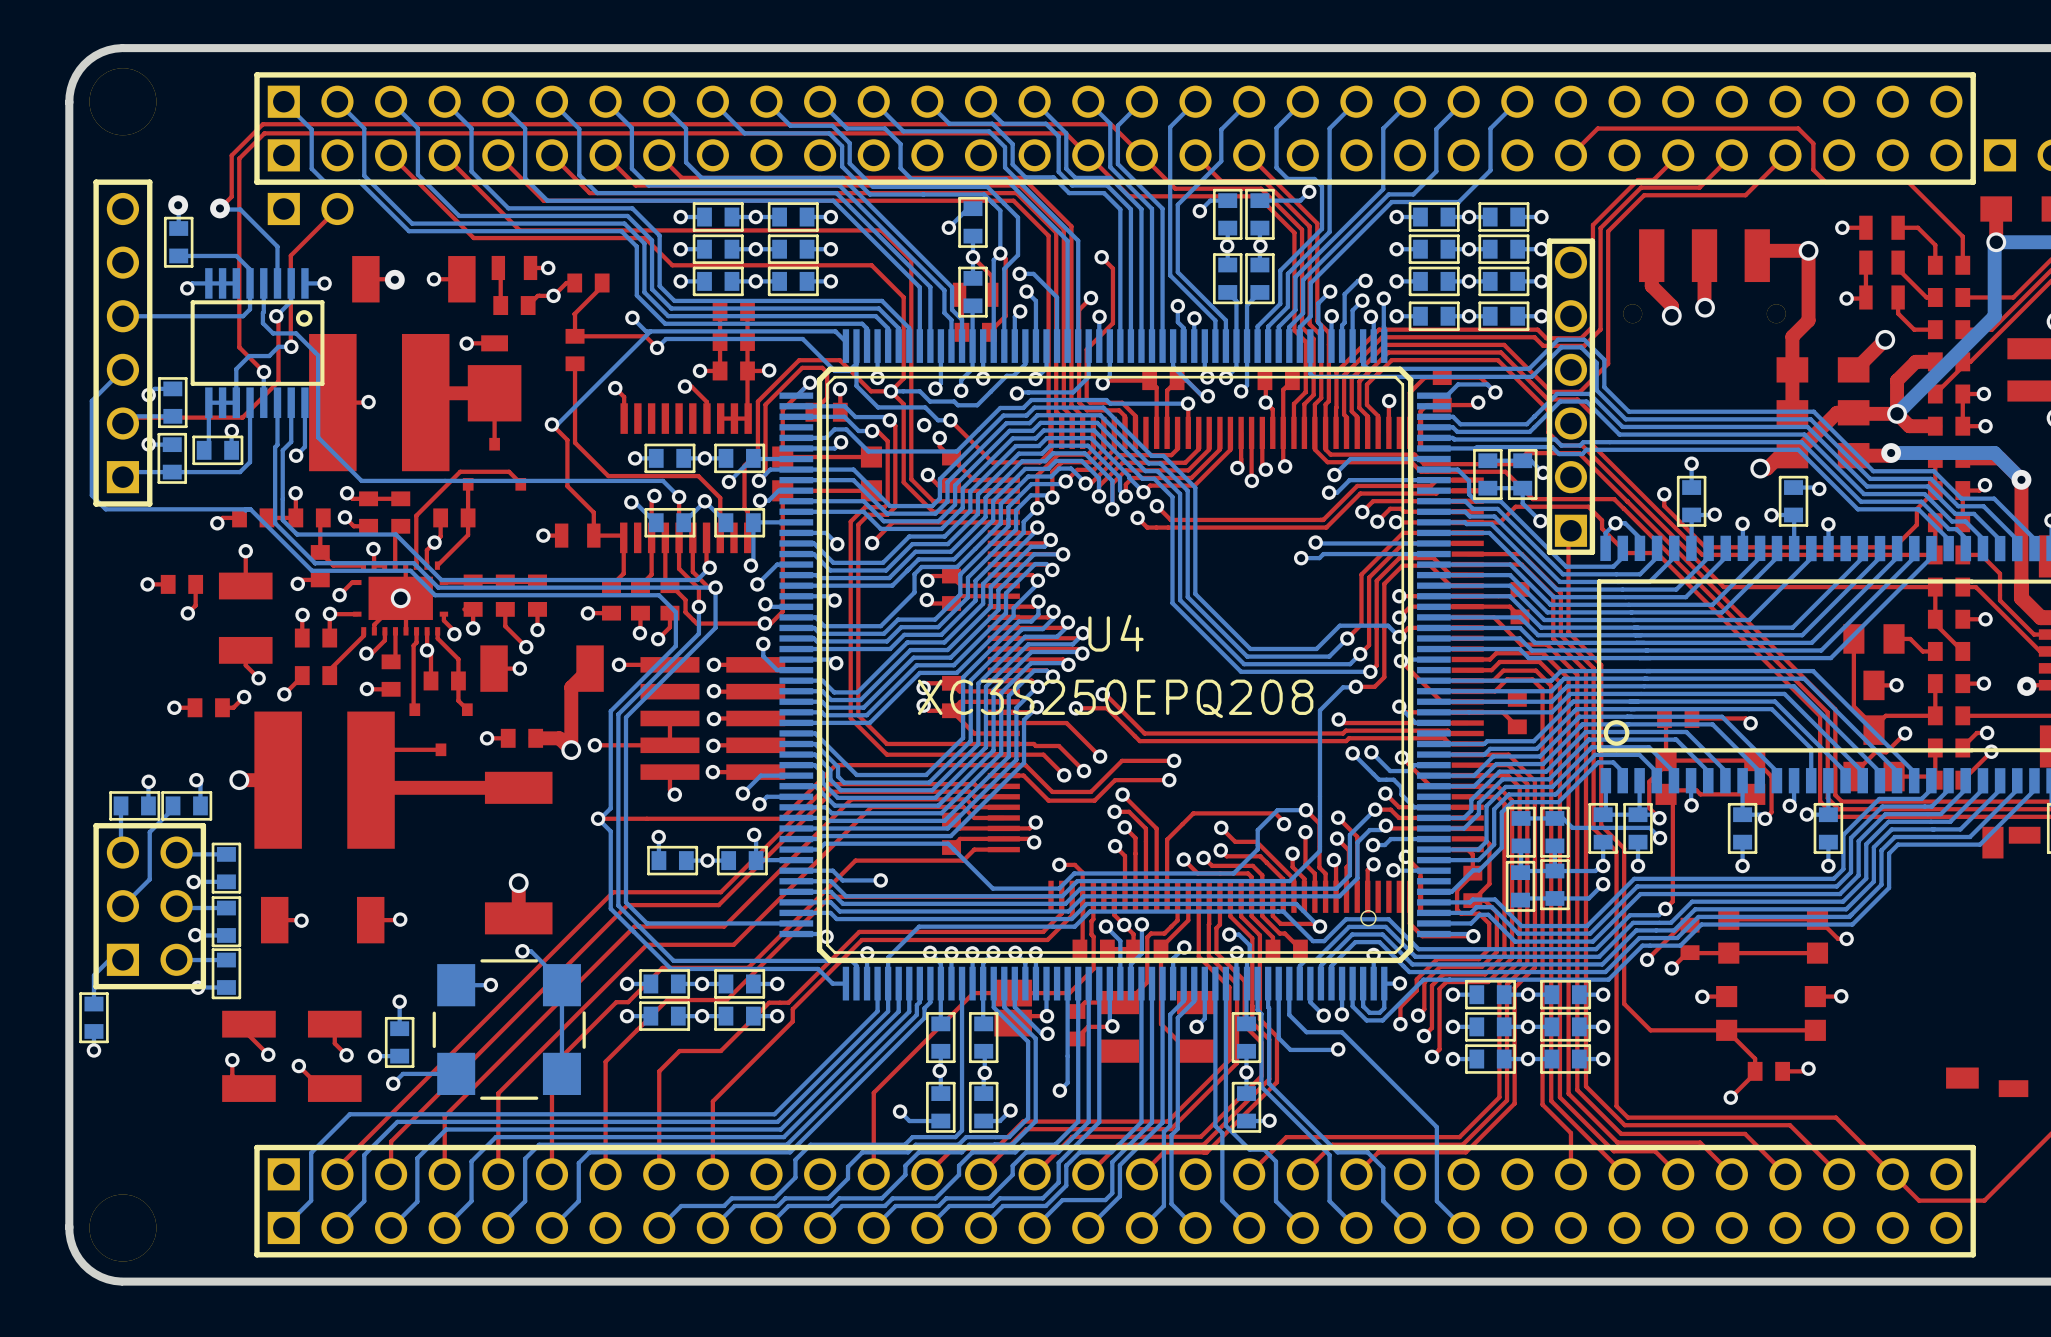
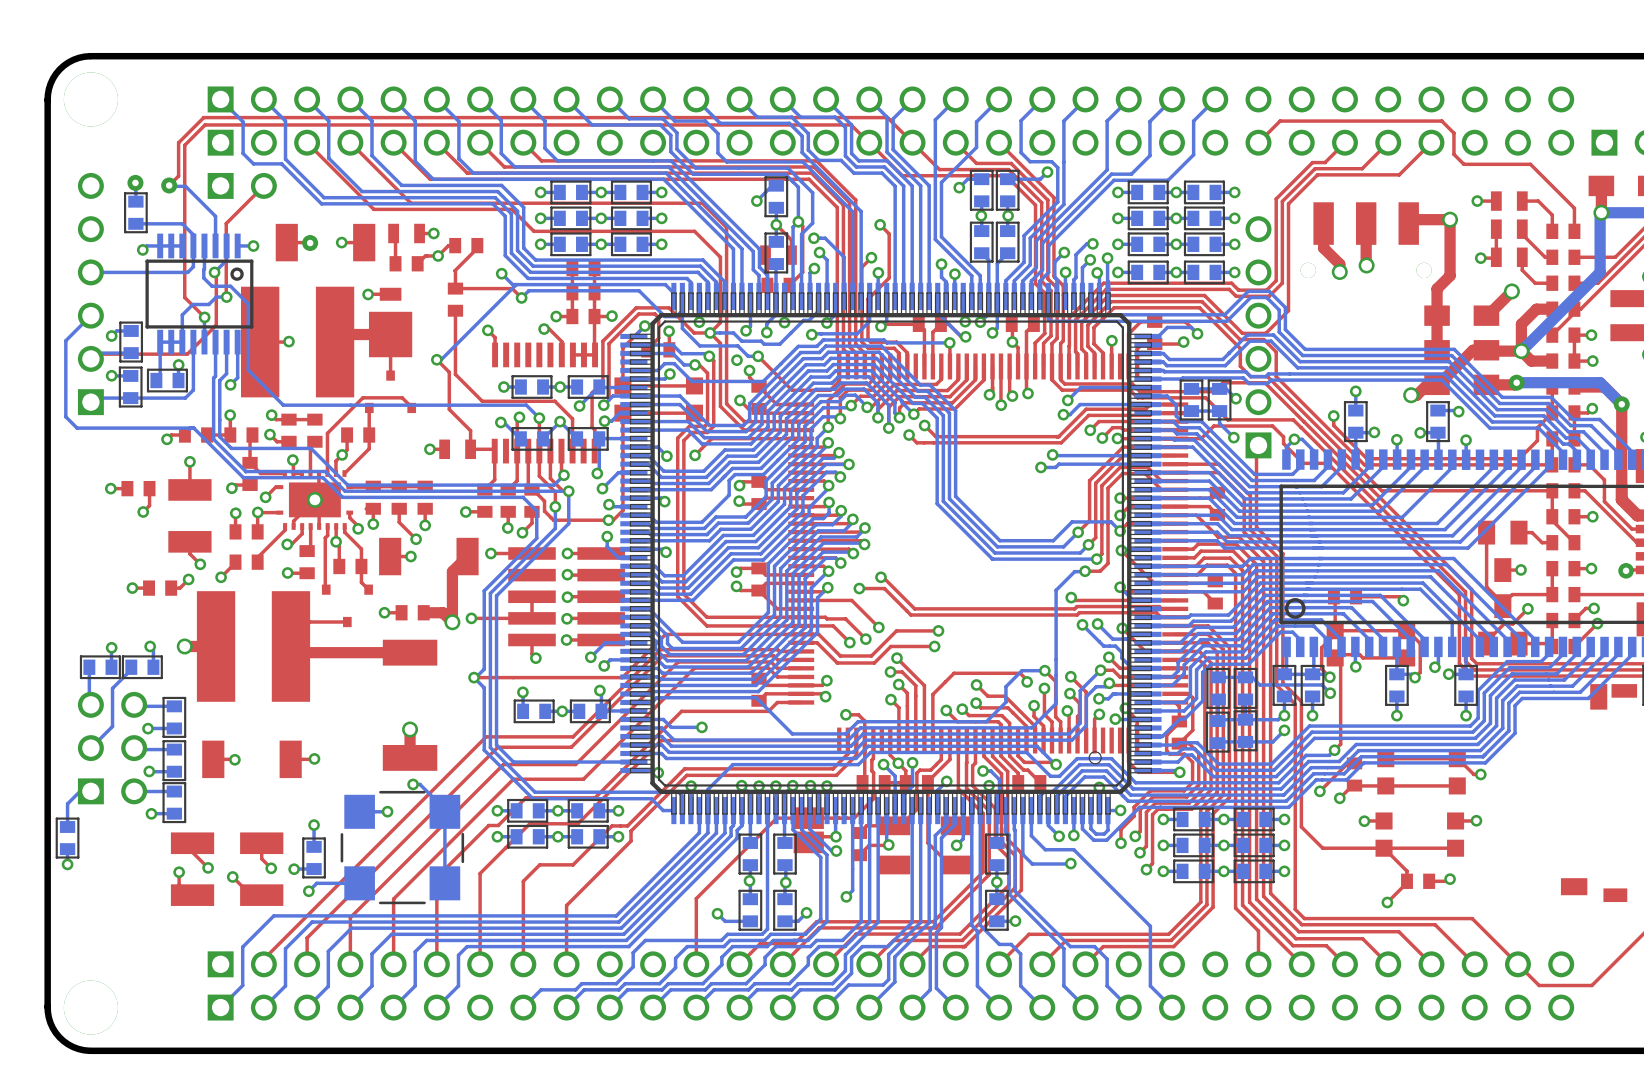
line: (1973, 74) (1973, 182) (257, 182) (257, 74) (1973, 74) -> none
line: (149, 182) (149, 503) (96, 503) (96, 182) (149, 182) -> none
line: (1592, 241) (1549, 241) (1549, 552) (1592, 552) (1592, 241) -> none
U4: XC3S250EPQ208 (1115, 664) -> none
part: none -> (890, 553)
line: (203, 825) (203, 986) (96, 986) (96, 825) (203, 825) -> none
line: (1973, 1147) (1973, 1254) (257, 1254) (257, 1147) (1973, 1147) -> none

